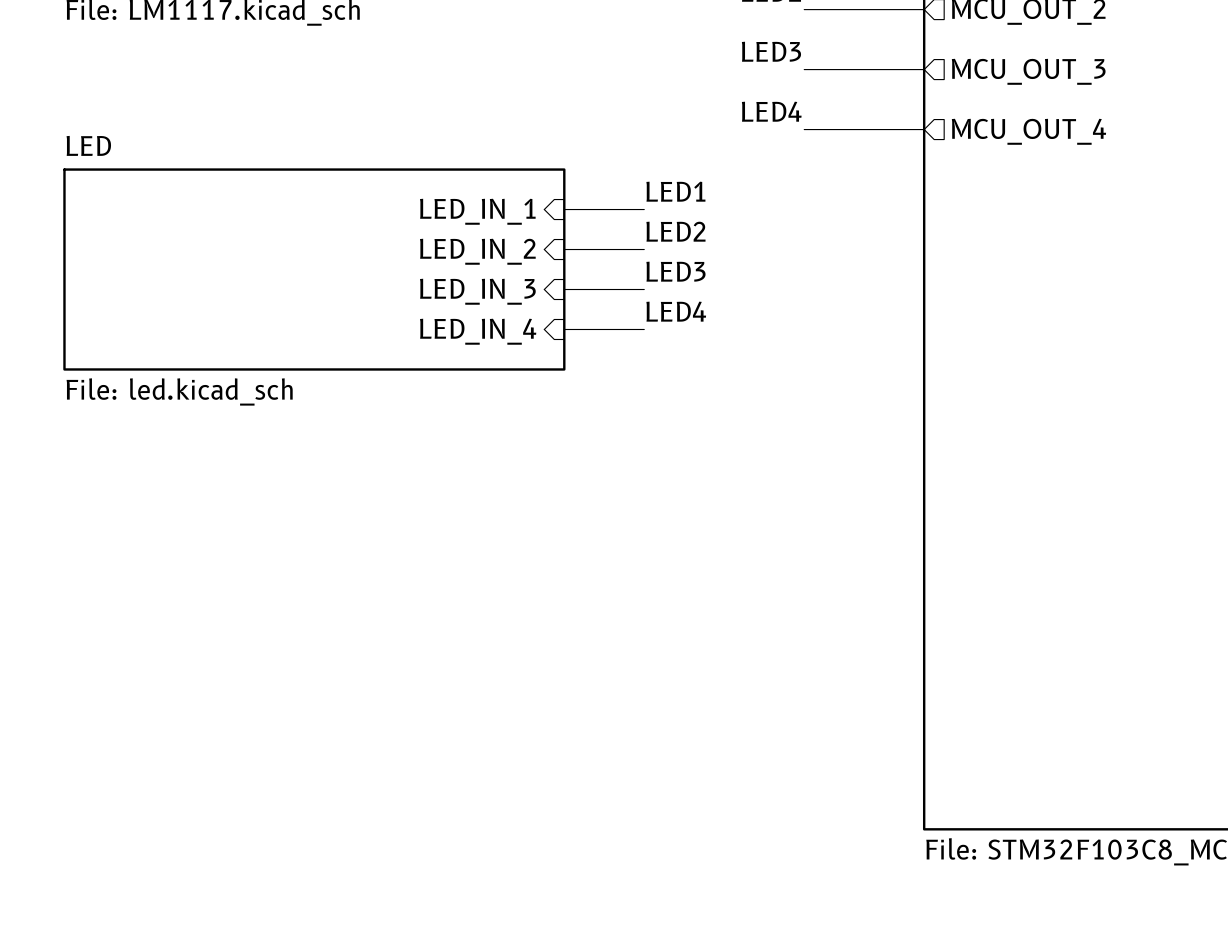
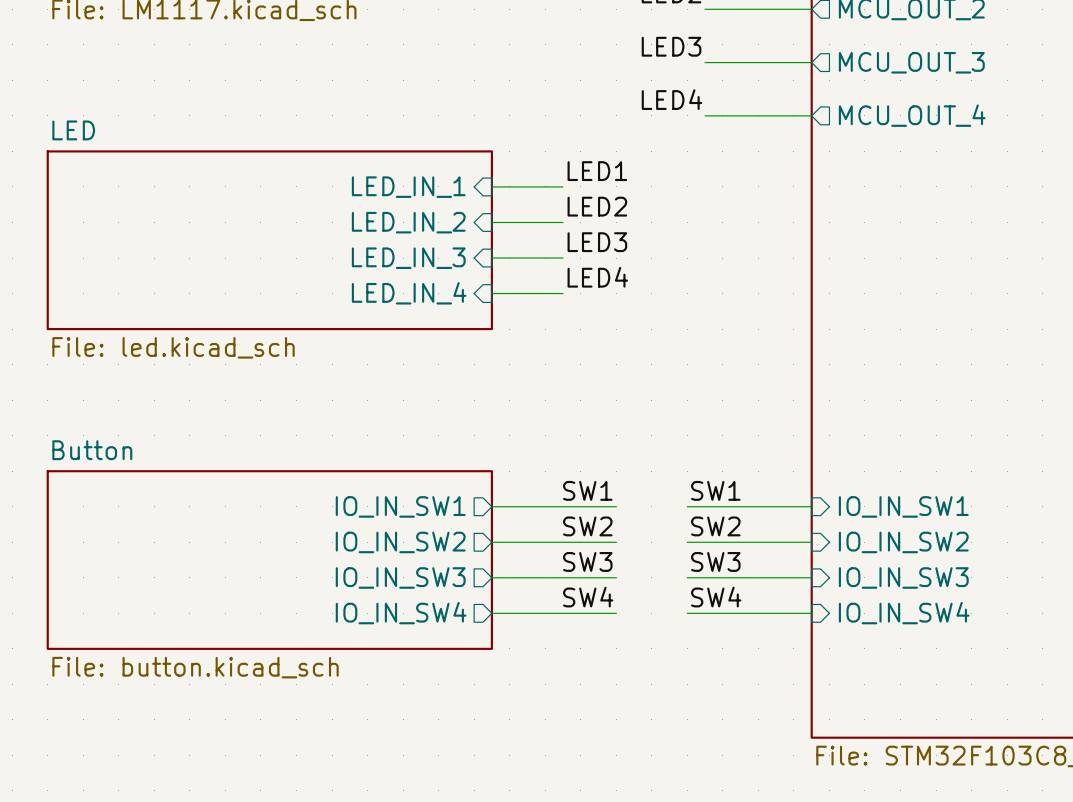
label: none -> SW1 (587, 490)
label: none -> SW1 (715, 490)
wire: none -> (491, 506) (616, 506)
wire: none -> (687, 506) (811, 506)
sheet pin: none -> IO_IN_SW1 (400, 506)
sheet pin: none -> IO_IN_SW1 (903, 506)
label: none -> SW2 (587, 526)
label: none -> SW2 (715, 526)
wire: none -> (491, 542) (616, 542)
wire: none -> (687, 542) (811, 542)
sheet pin: none -> IO_IN_SW2 (400, 542)
sheet pin: none -> IO_IN_SW2 (903, 542)
sheet Button: none -> File: button.kicad_sch (269, 560)
label: none -> SW3 (587, 561)
label: none -> SW3 (715, 561)
wire: none -> (491, 577) (616, 577)
wire: none -> (687, 577) (811, 577)
sheet pin: none -> IO_IN_SW3 (400, 577)
sheet pin: none -> IO_IN_SW3 (903, 577)
label: none -> SW4 (588, 597)
label: none -> SW4 (716, 597)
wire: none -> (491, 613) (616, 613)
wire: none -> (687, 613) (811, 613)
sheet pin: none -> IO_IN_SW4 (401, 613)
sheet pin: none -> IO_IN_SW4 (904, 613)

